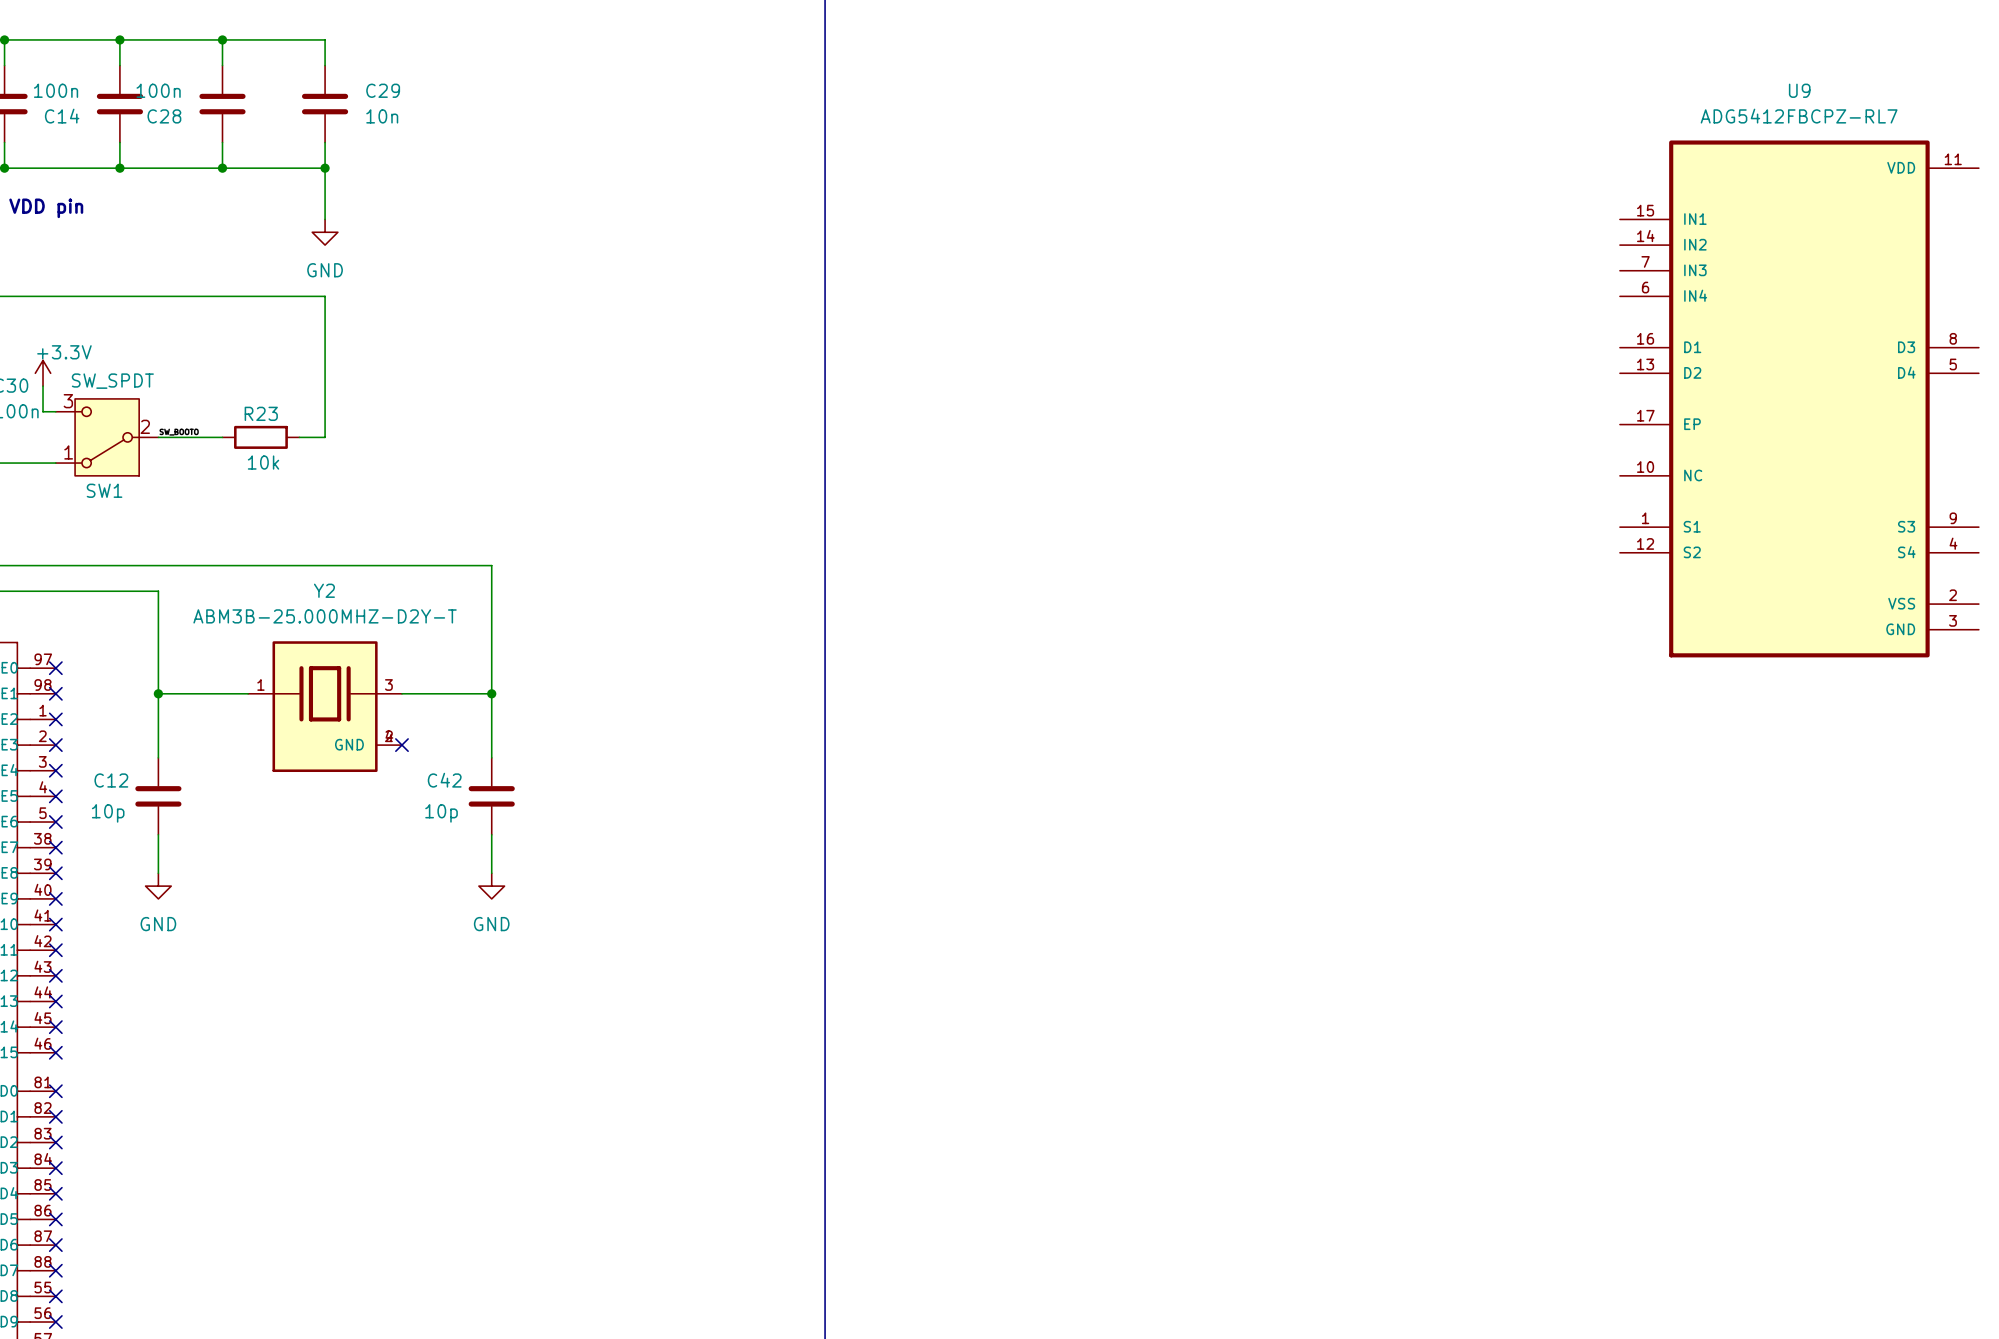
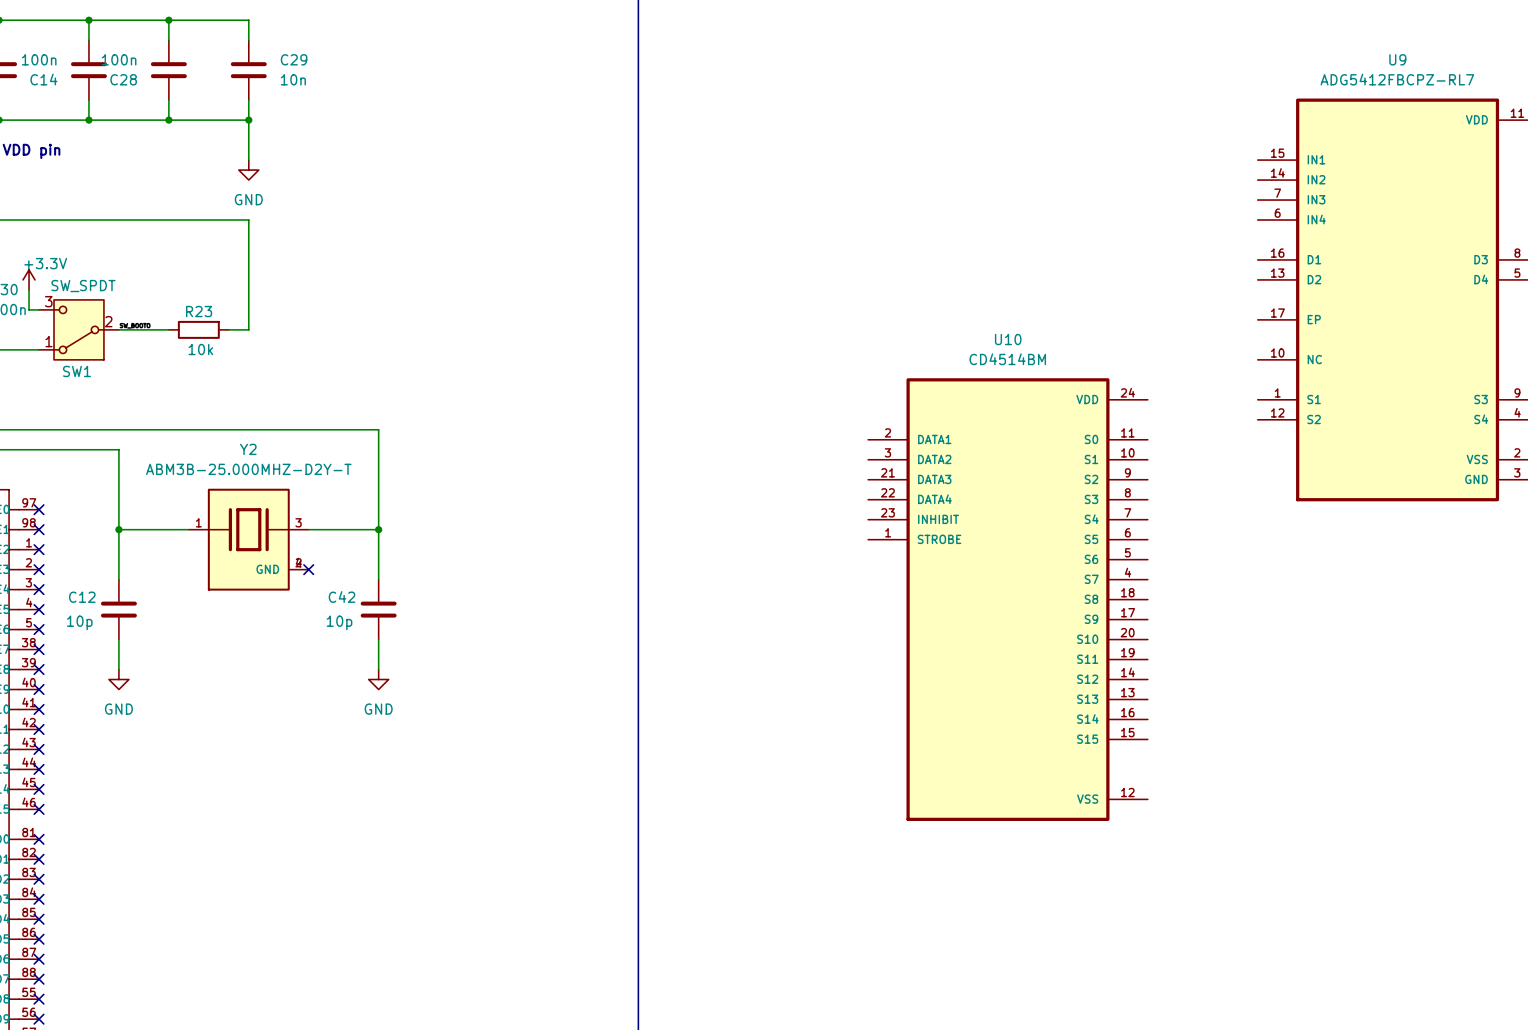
U10: none -> CD4514BM (1007, 599)

